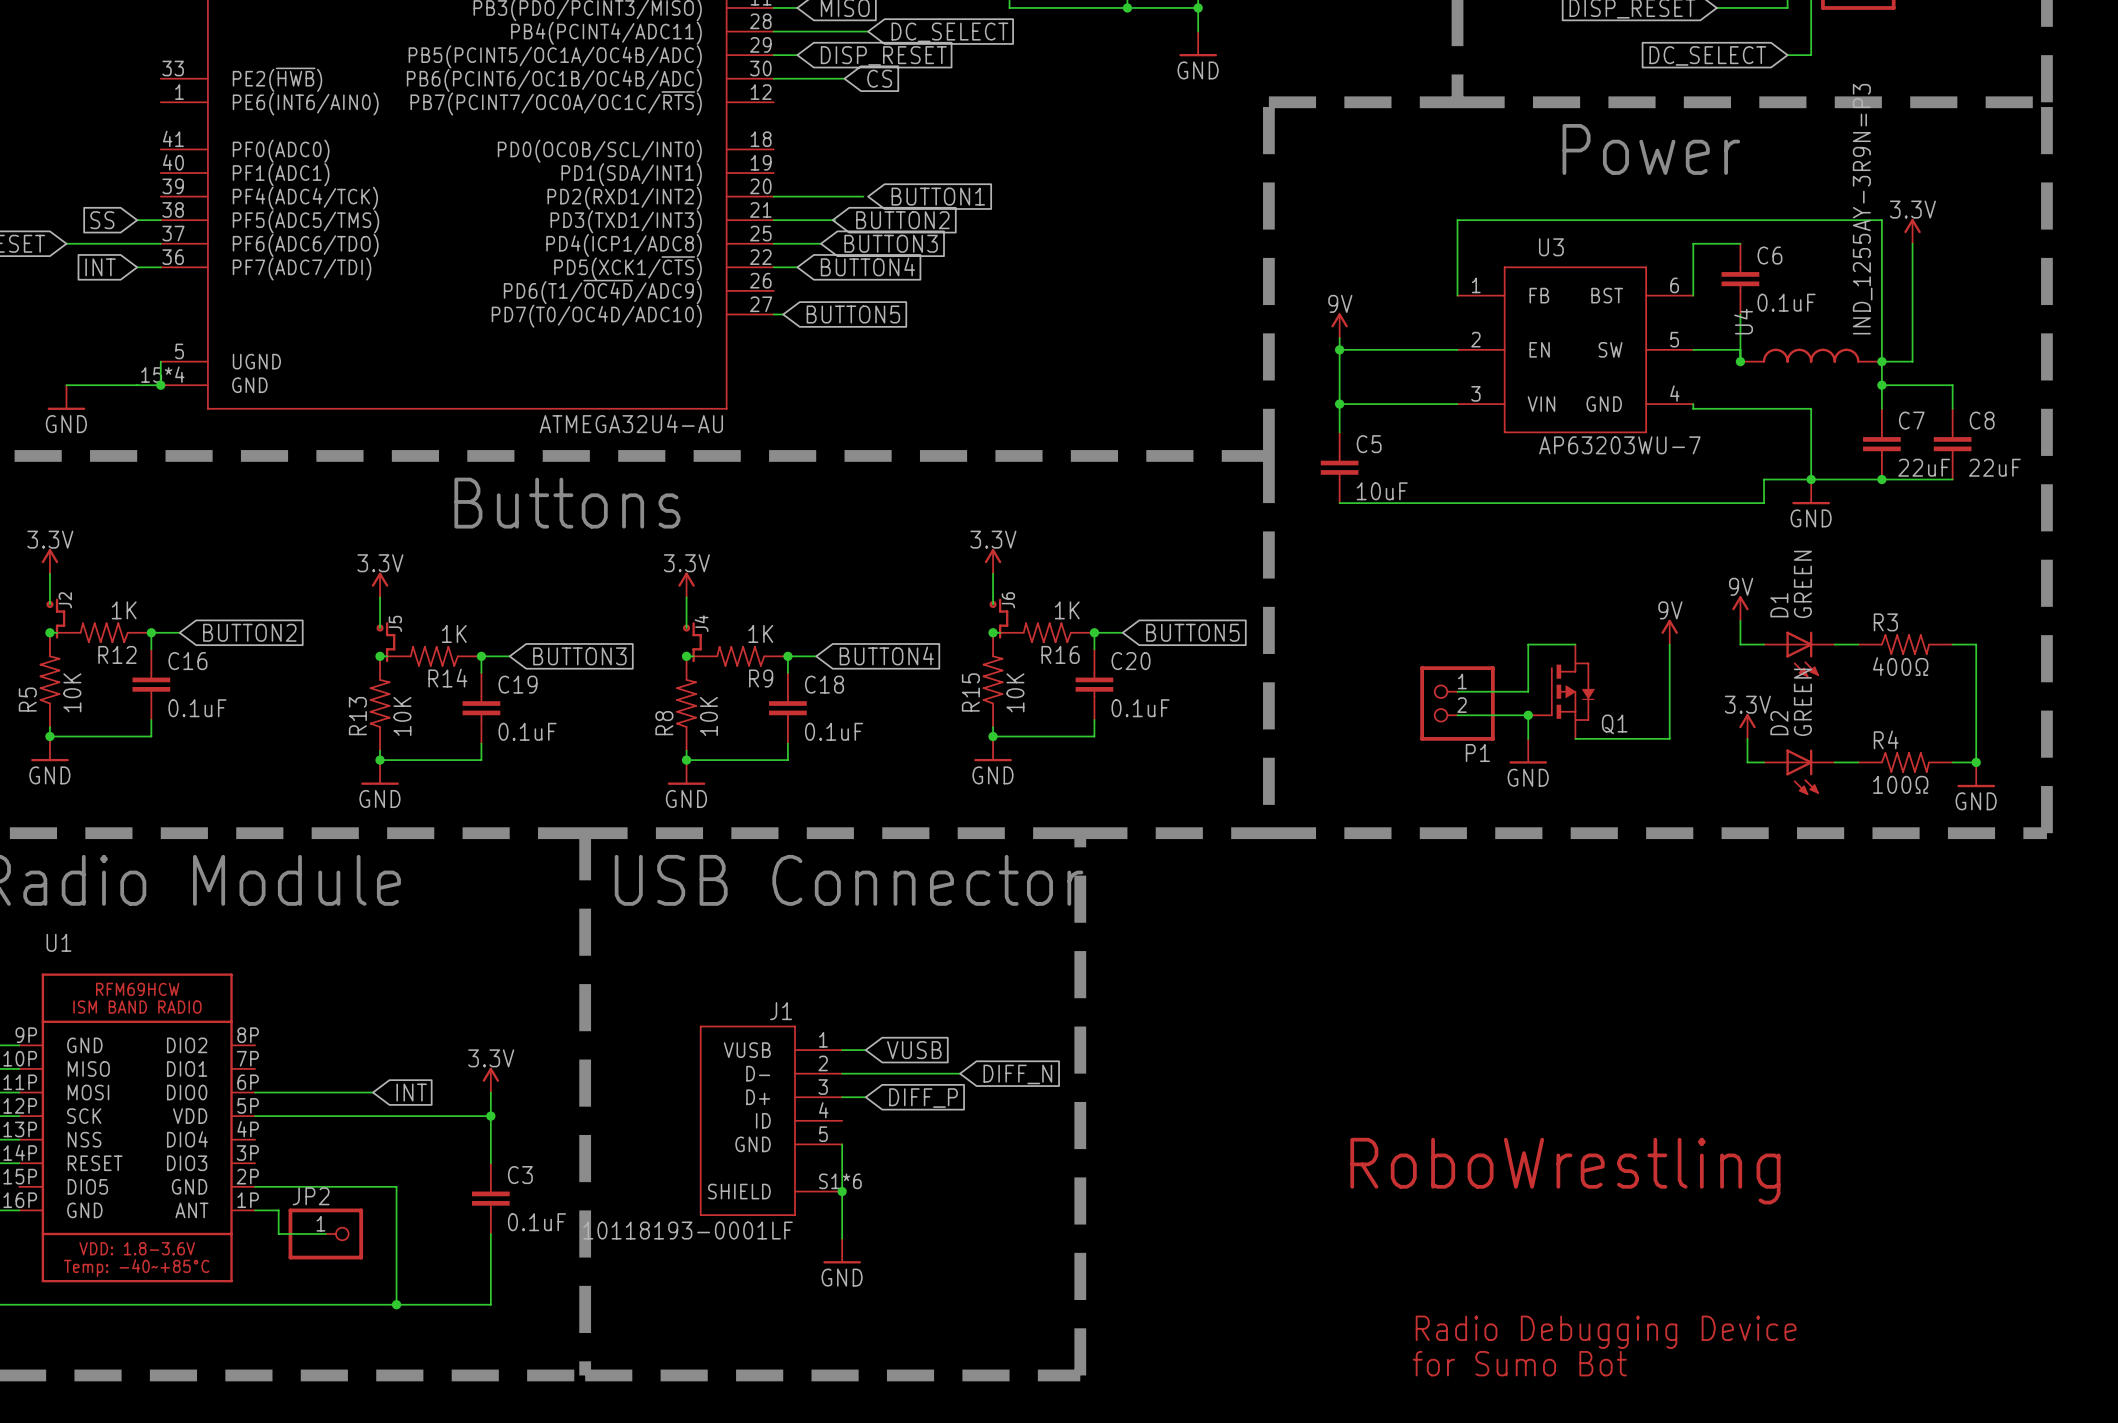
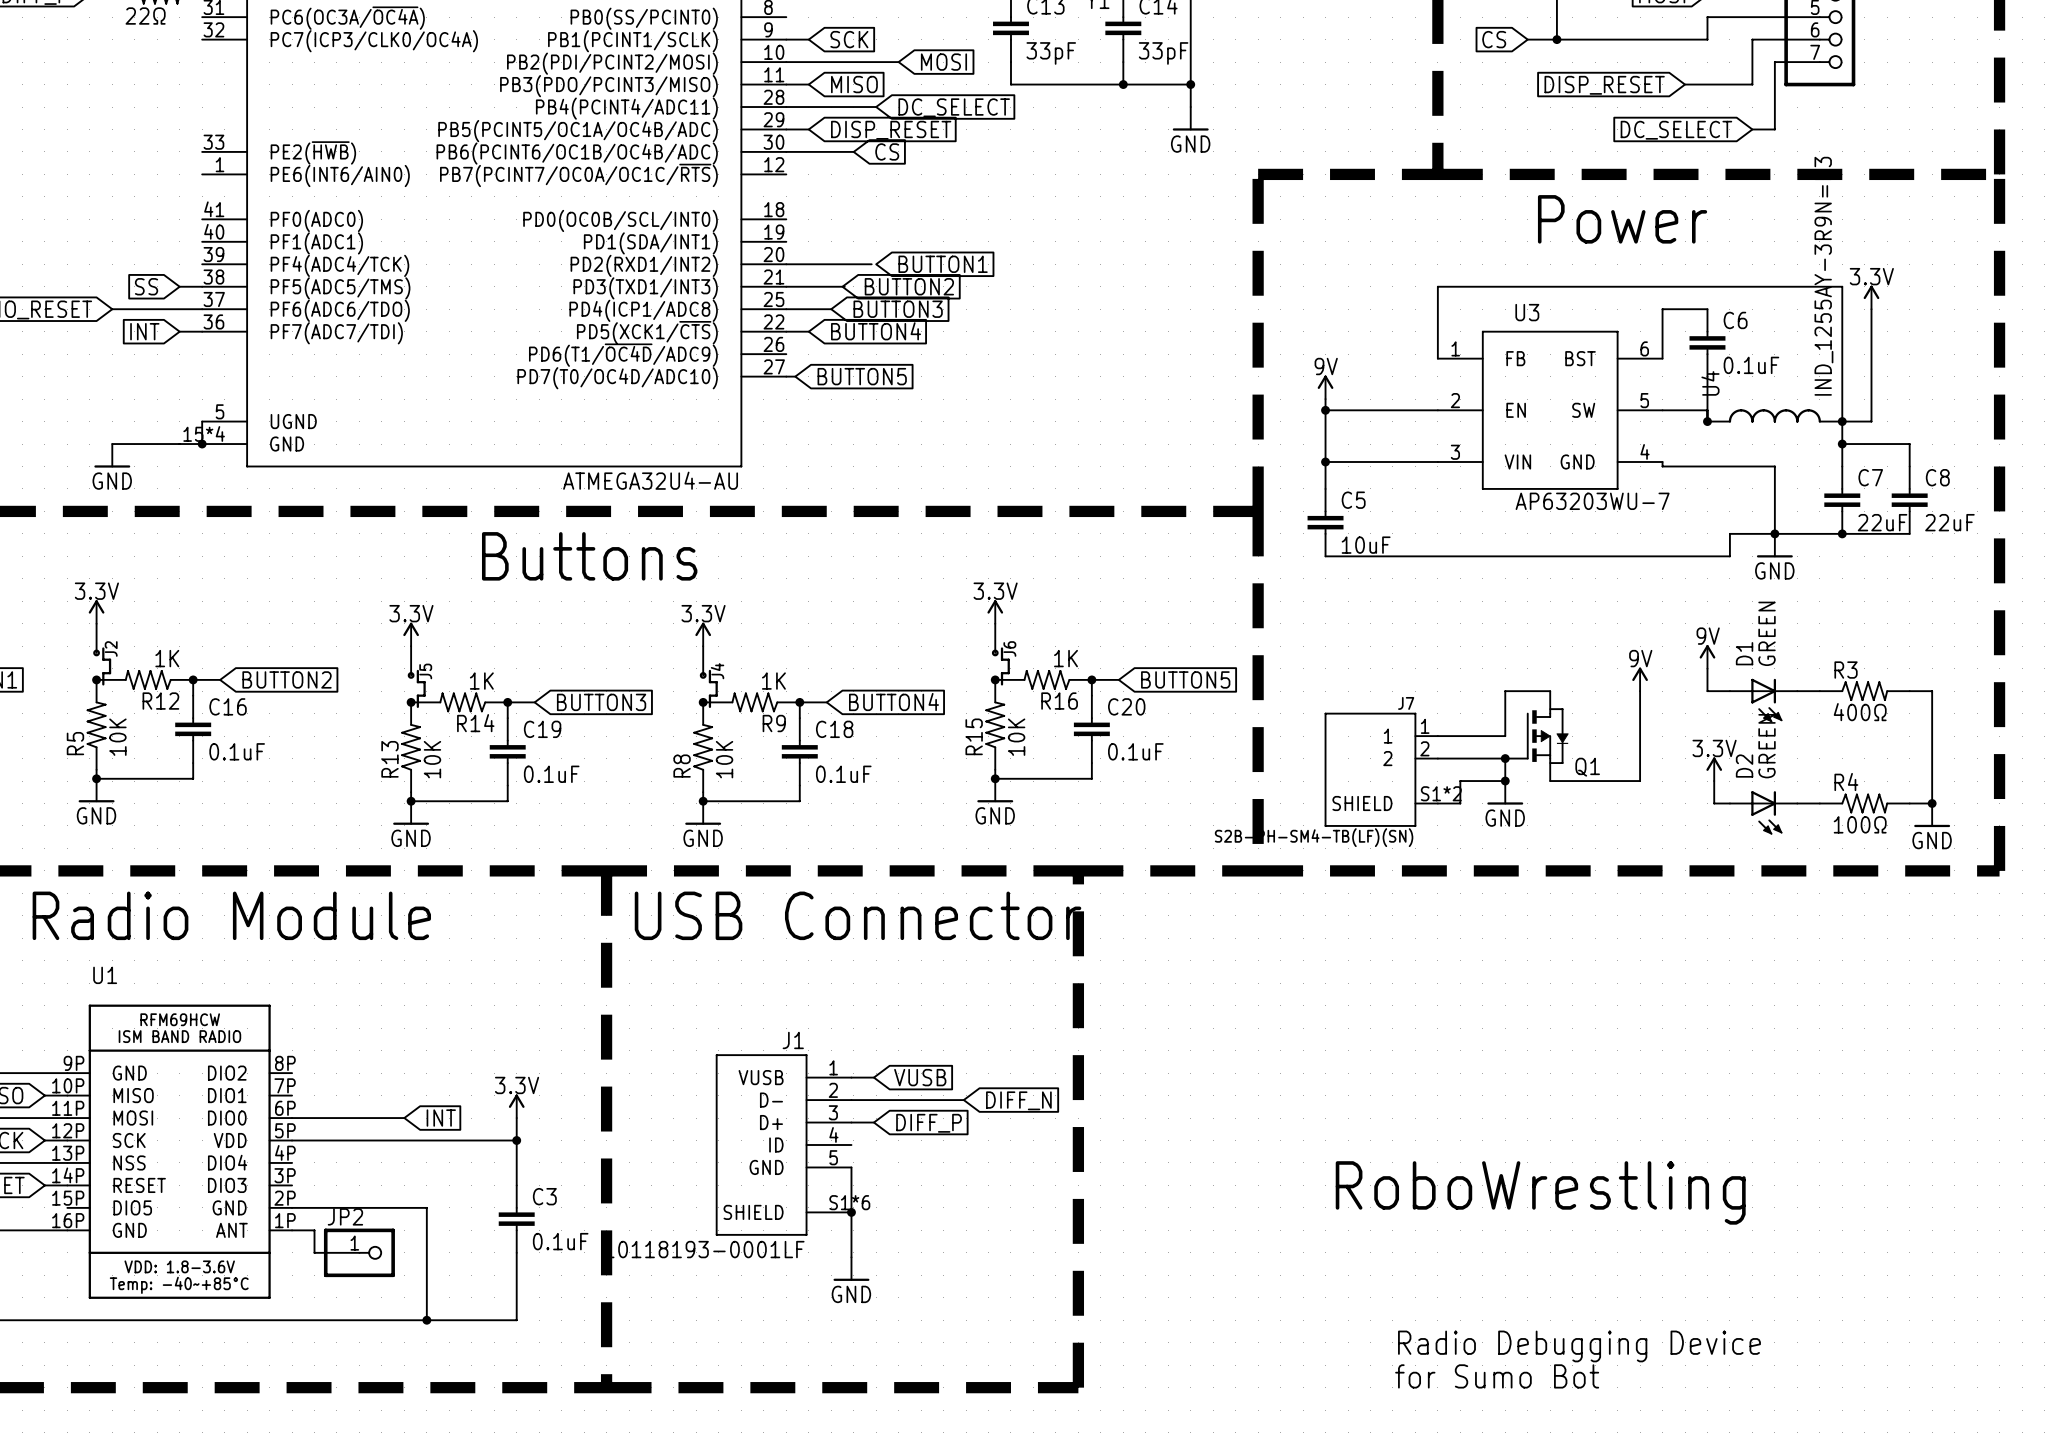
P1: (1457, 703) -> none
J7: none -> S2B-PH-SM4-TB(LF)(SN) (1381, 769)
wire: none -> (1505, 781) (1460, 781) (1460, 803) (1437, 803)
junction: none -> (1505, 781)

